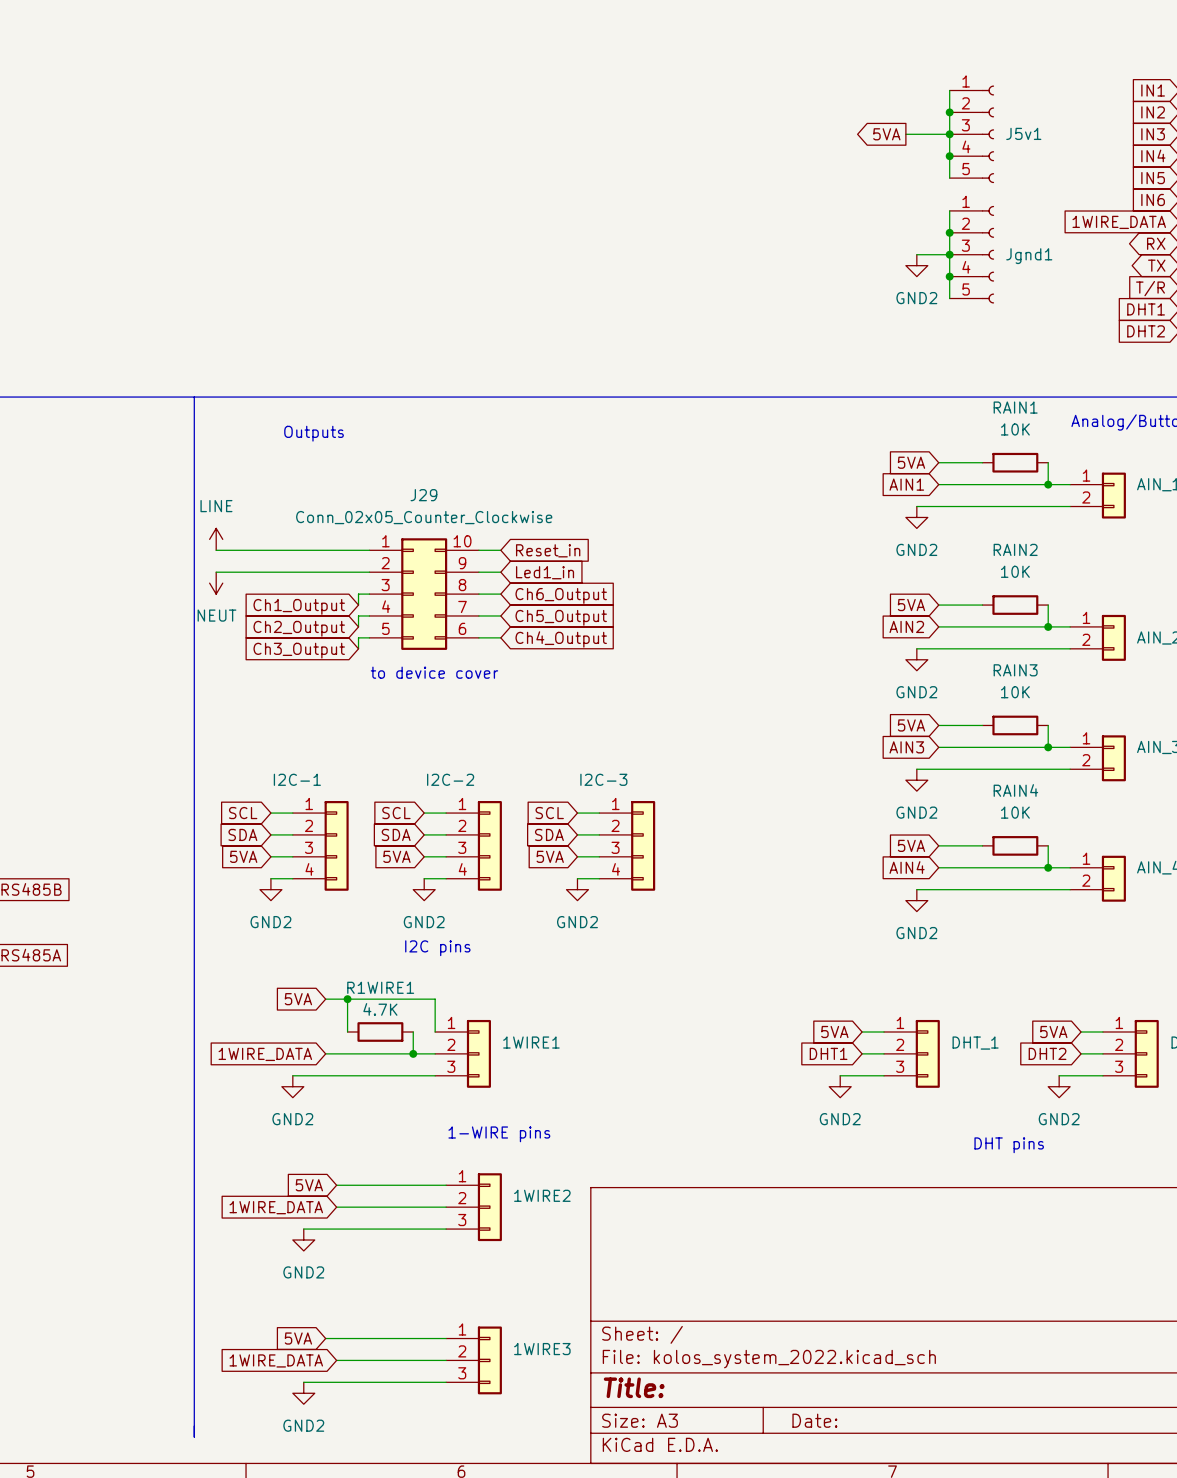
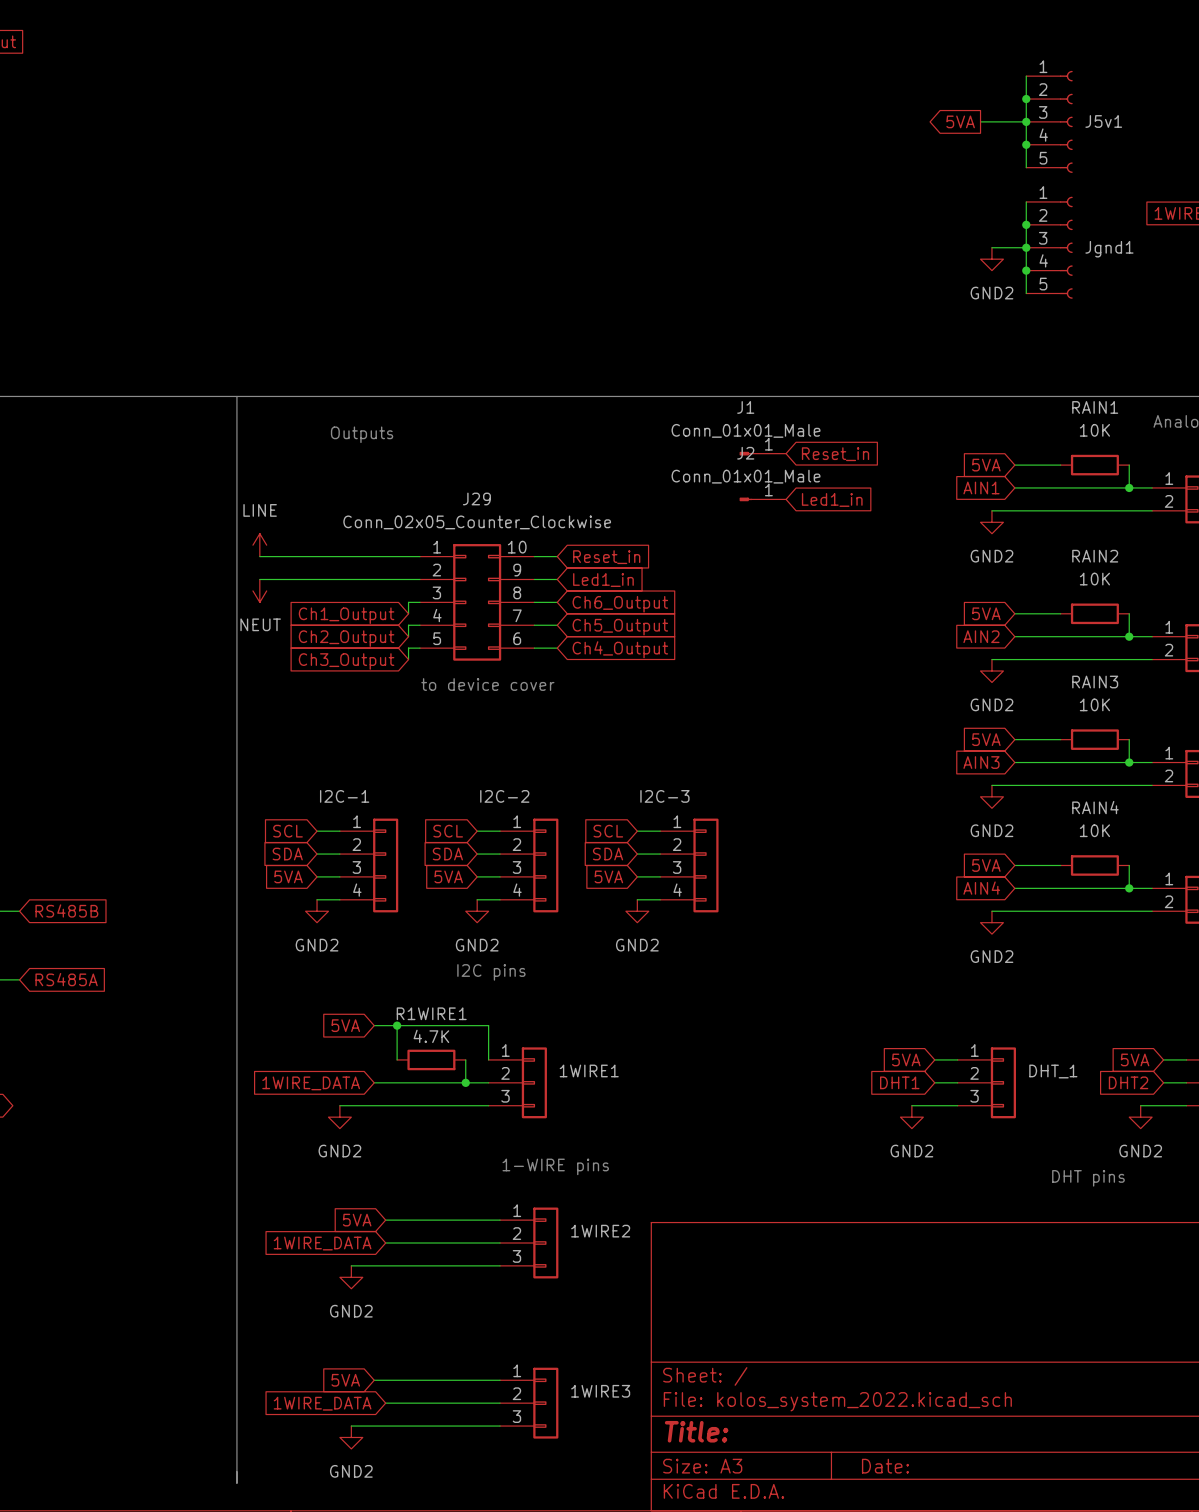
J1: none -> Conn_01x01_Male (762, 453)
global label: none -> Reset_in (835, 454)
J2: none -> Conn_01x01_Male (762, 499)
global label: none -> Led1_in (832, 499)

